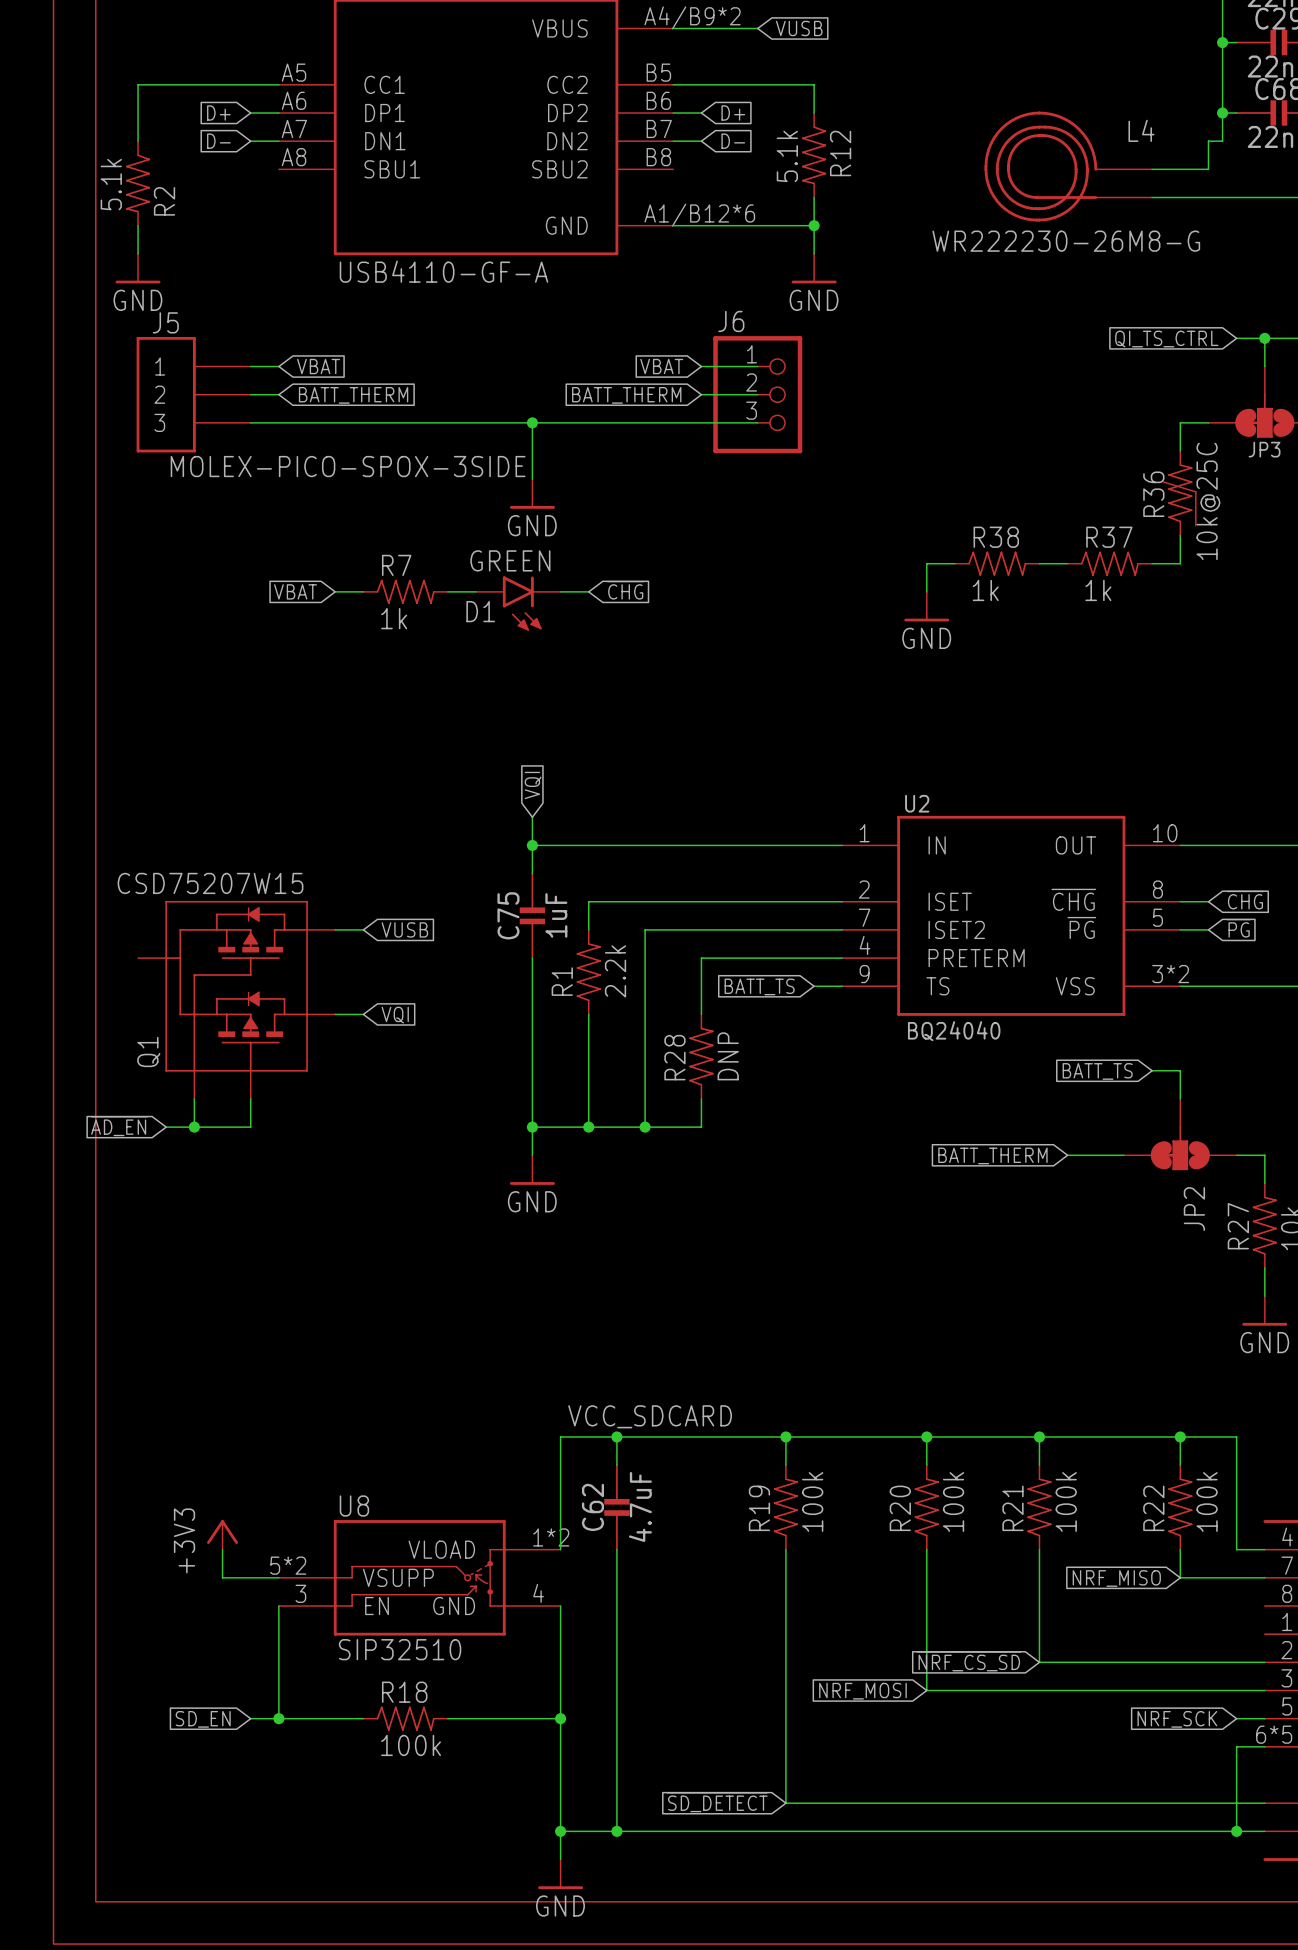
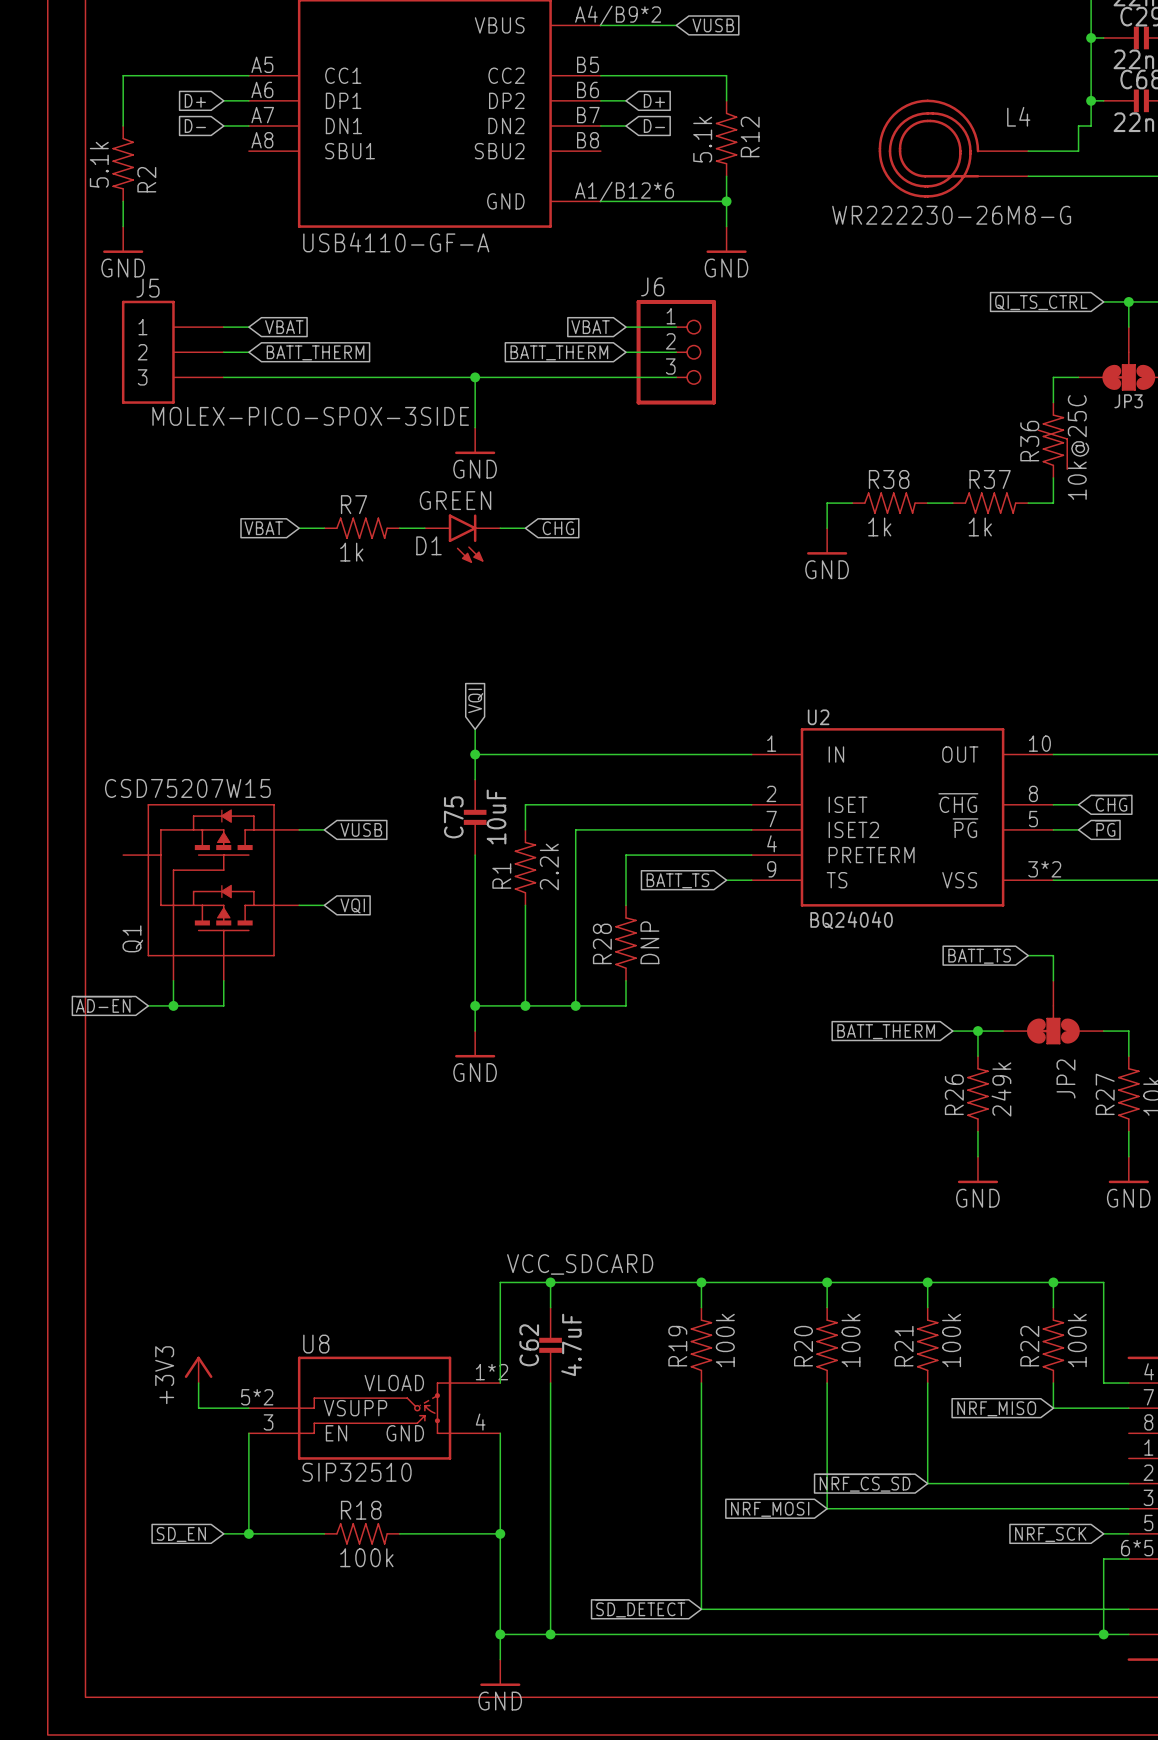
C75 value: 1uF (556, 915) -> 10uF (496, 816)
global label: ~{AD_EN} (119, 1126) -> ~{AD-EN} (104, 1004)
wire: none -> (977, 1031) (977, 1056)
junction: none -> (977, 1031)
R26: none -> 249k (977, 1093)
wire: none -> (977, 1131) (977, 1156)
power symbol: none -> GND (977, 1169)

